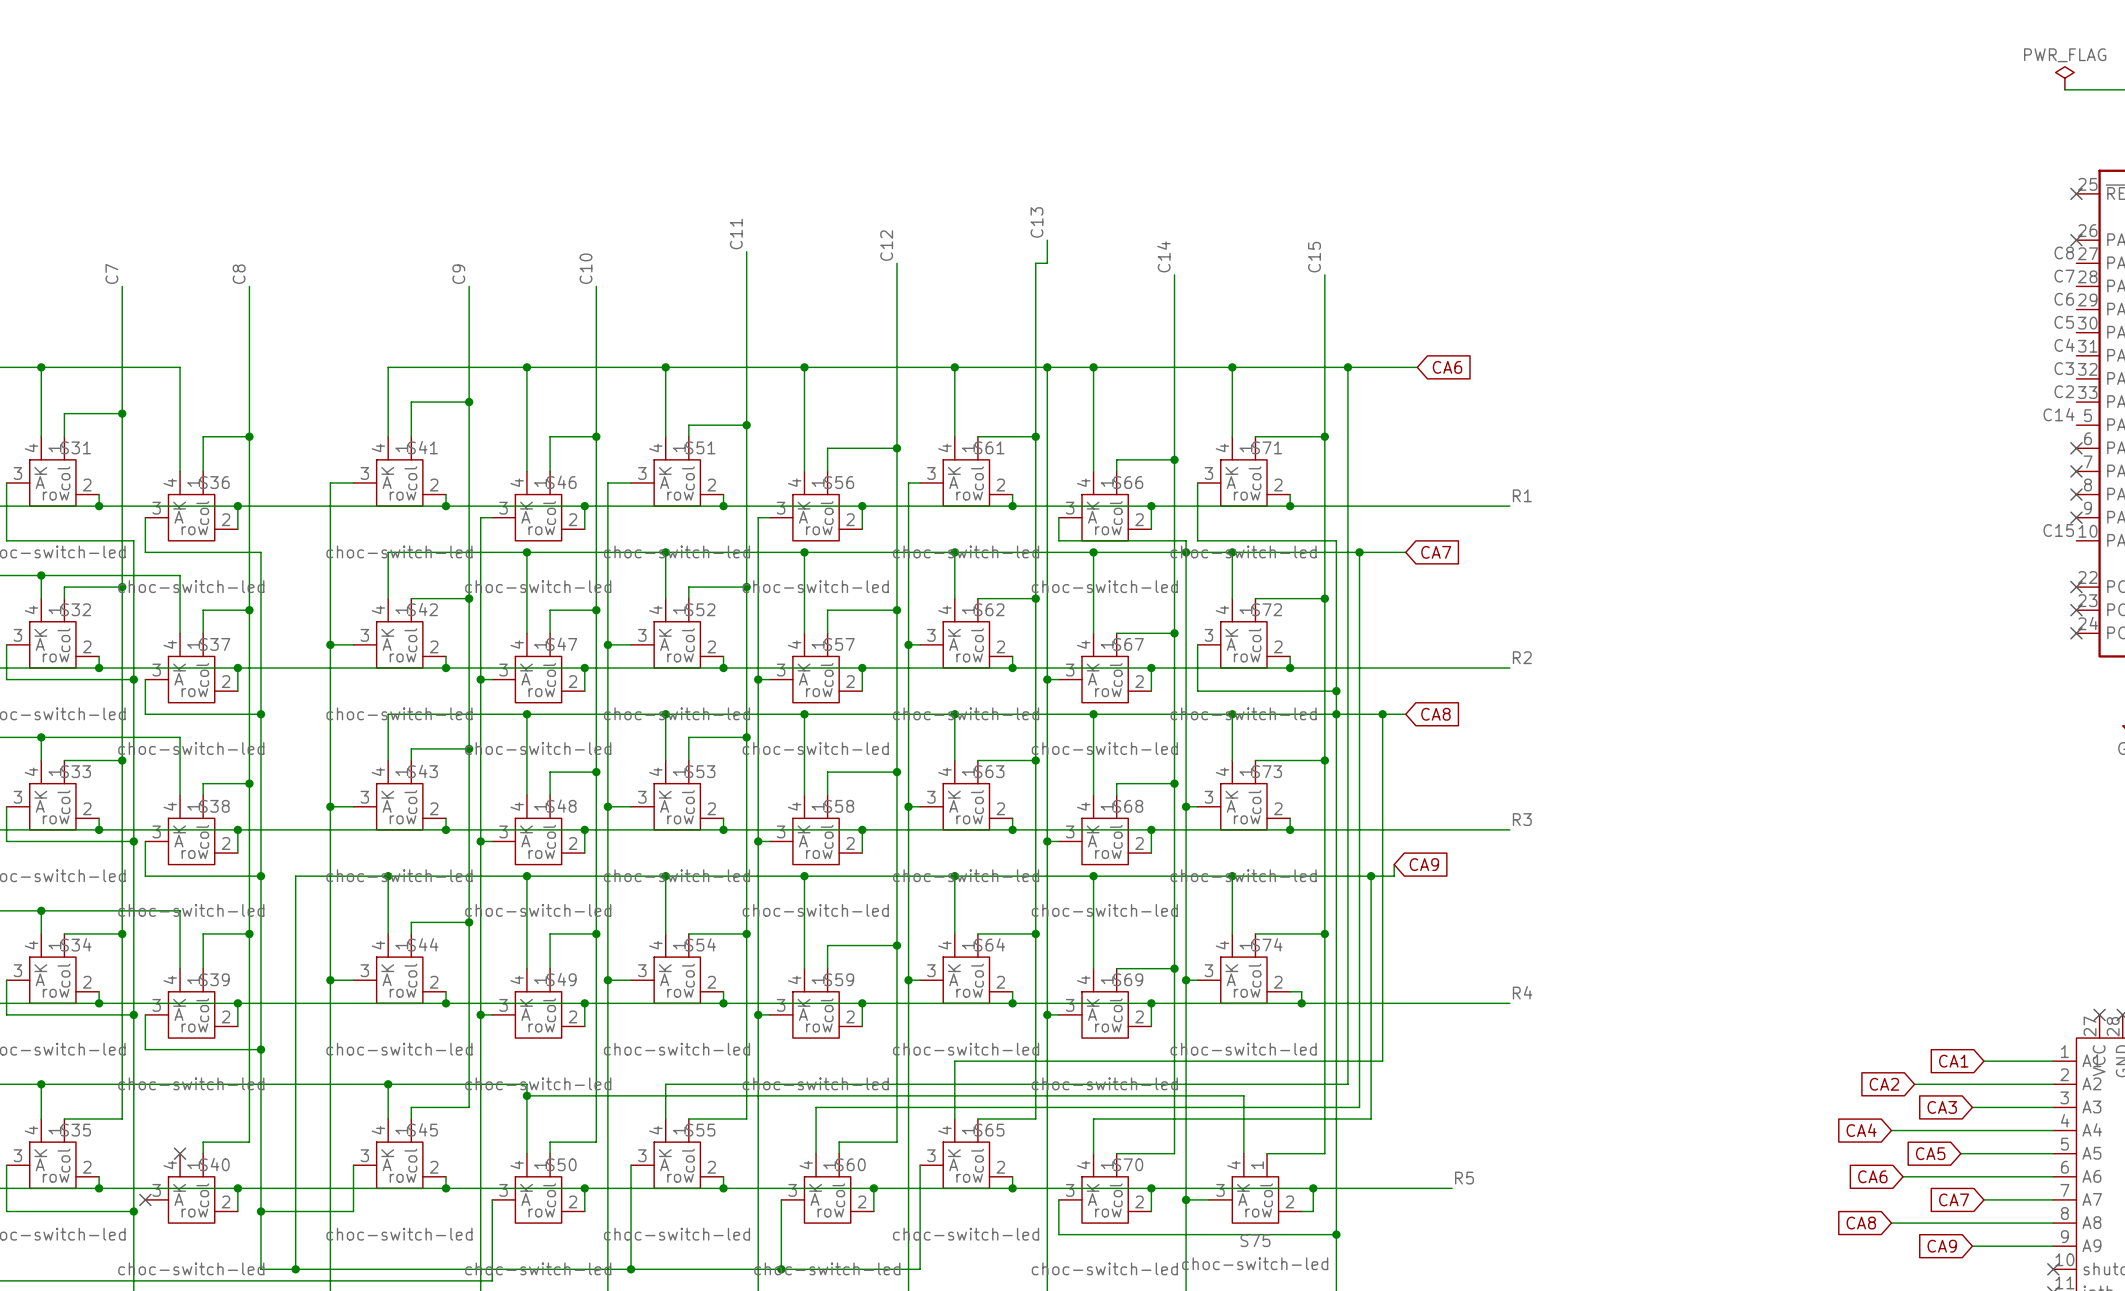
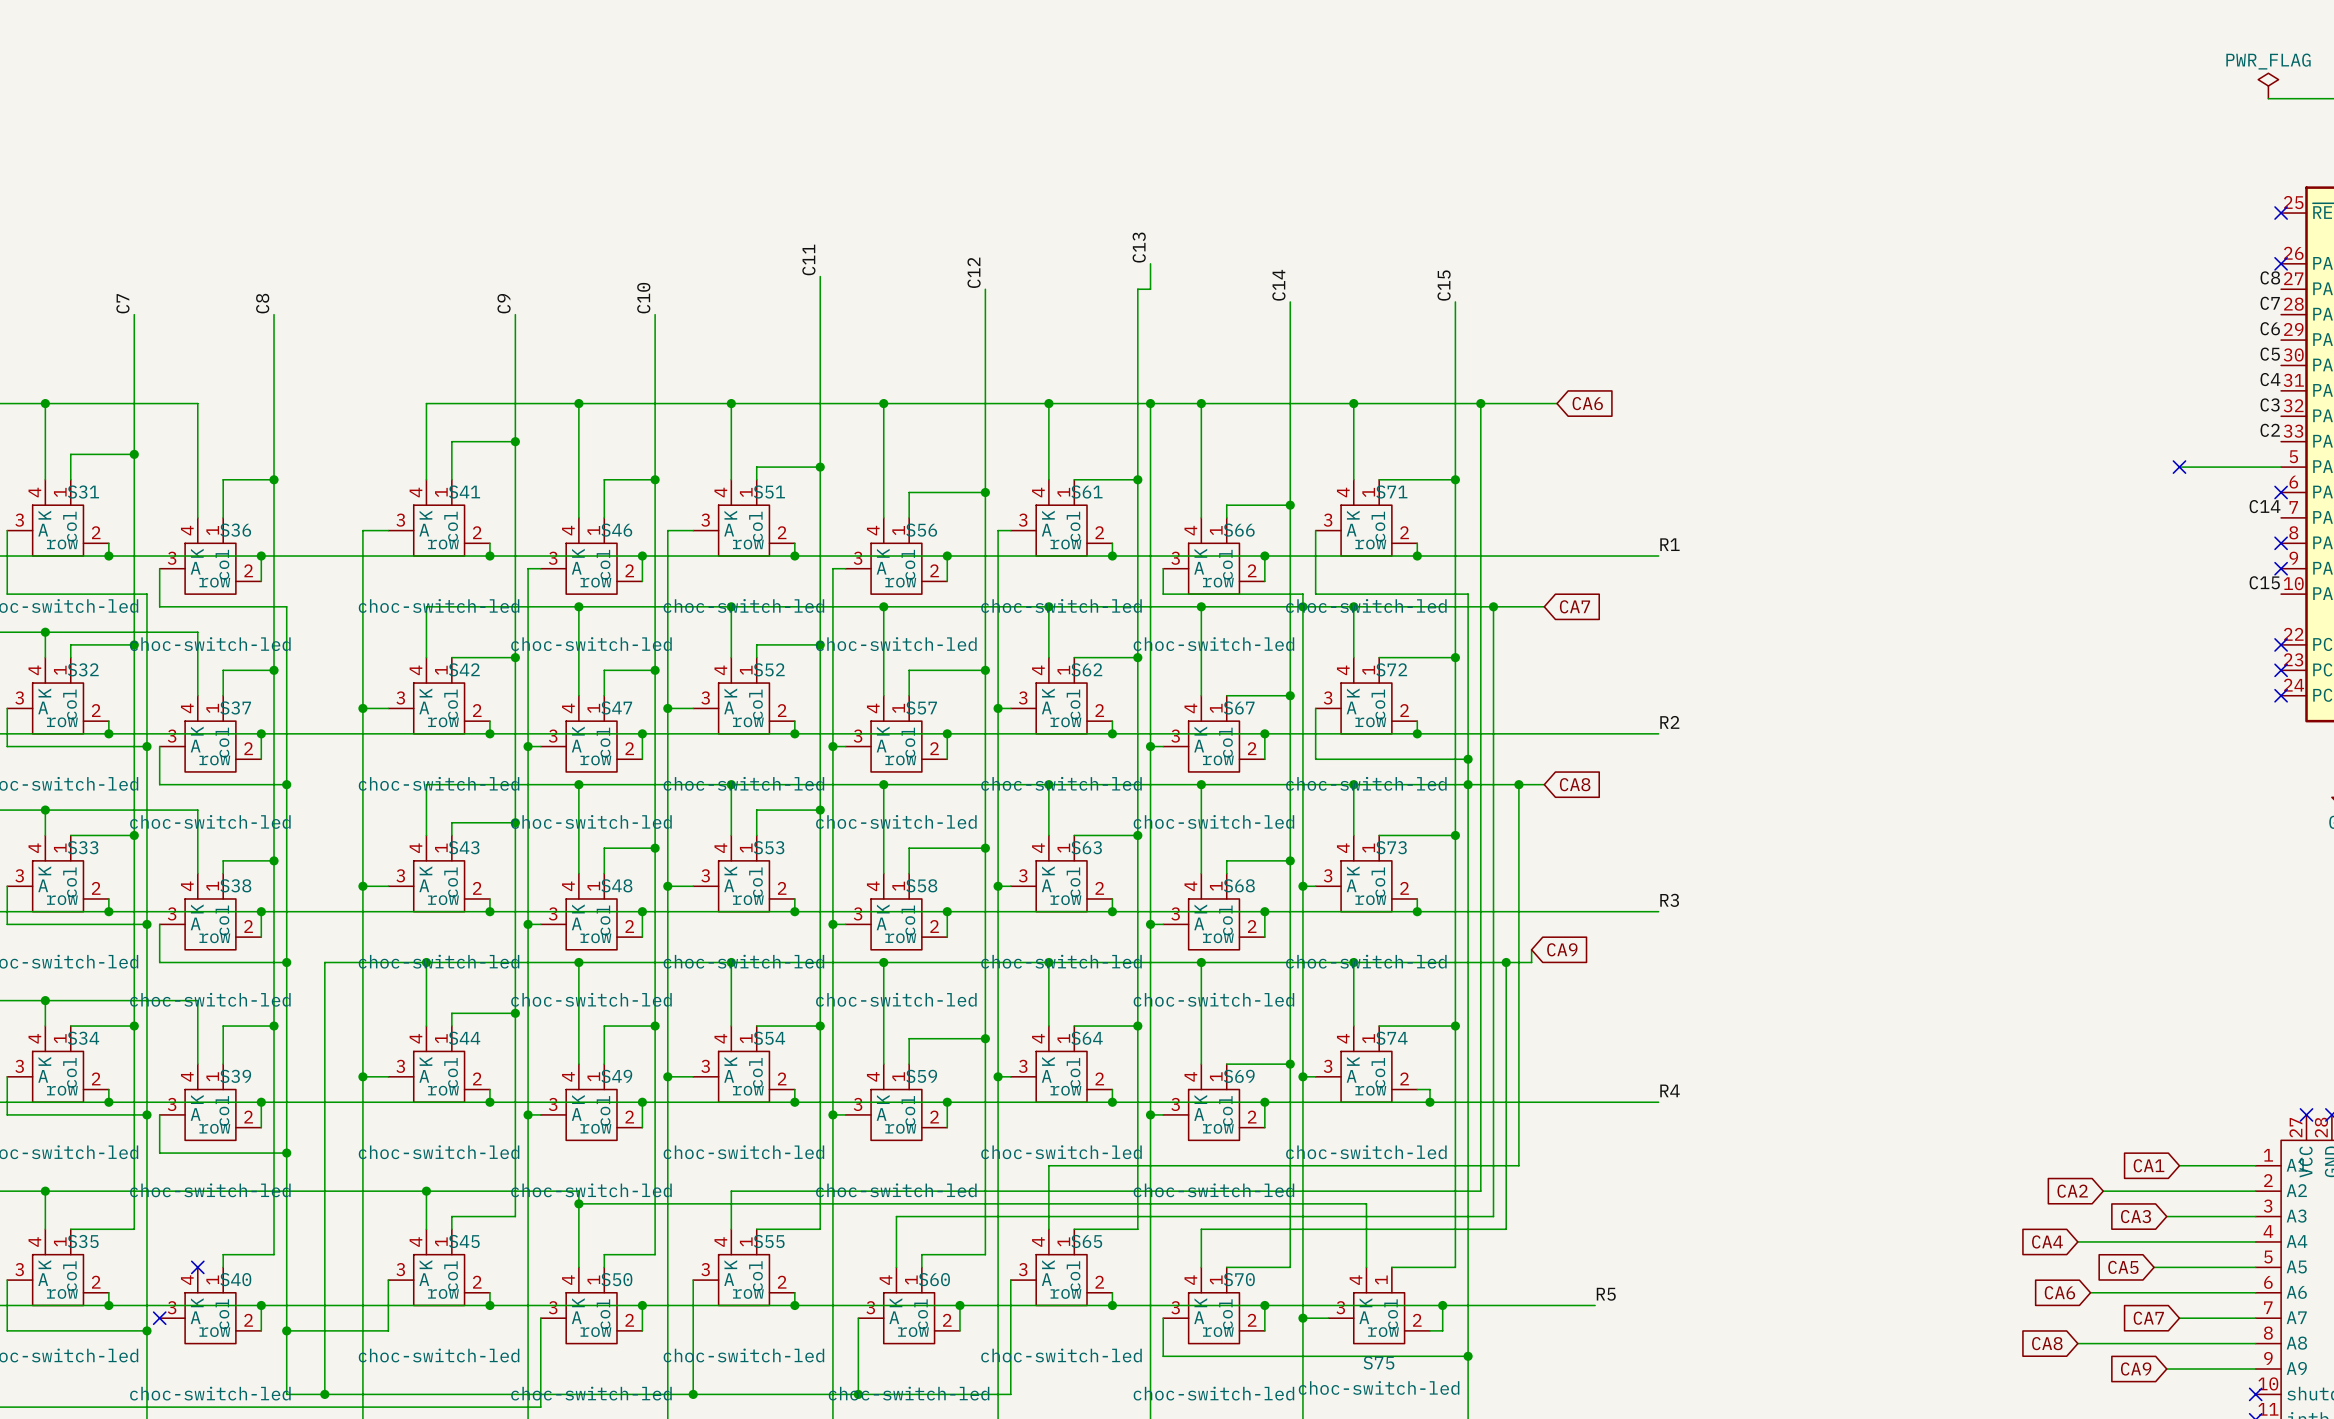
label position: C14 (2059, 414) -> C14 (2265, 506)
wire: none -> (2179, 467) (2281, 467)
no-connect mark: none -> (2179, 467)
no-connect mark: (2076, 471) -> none

